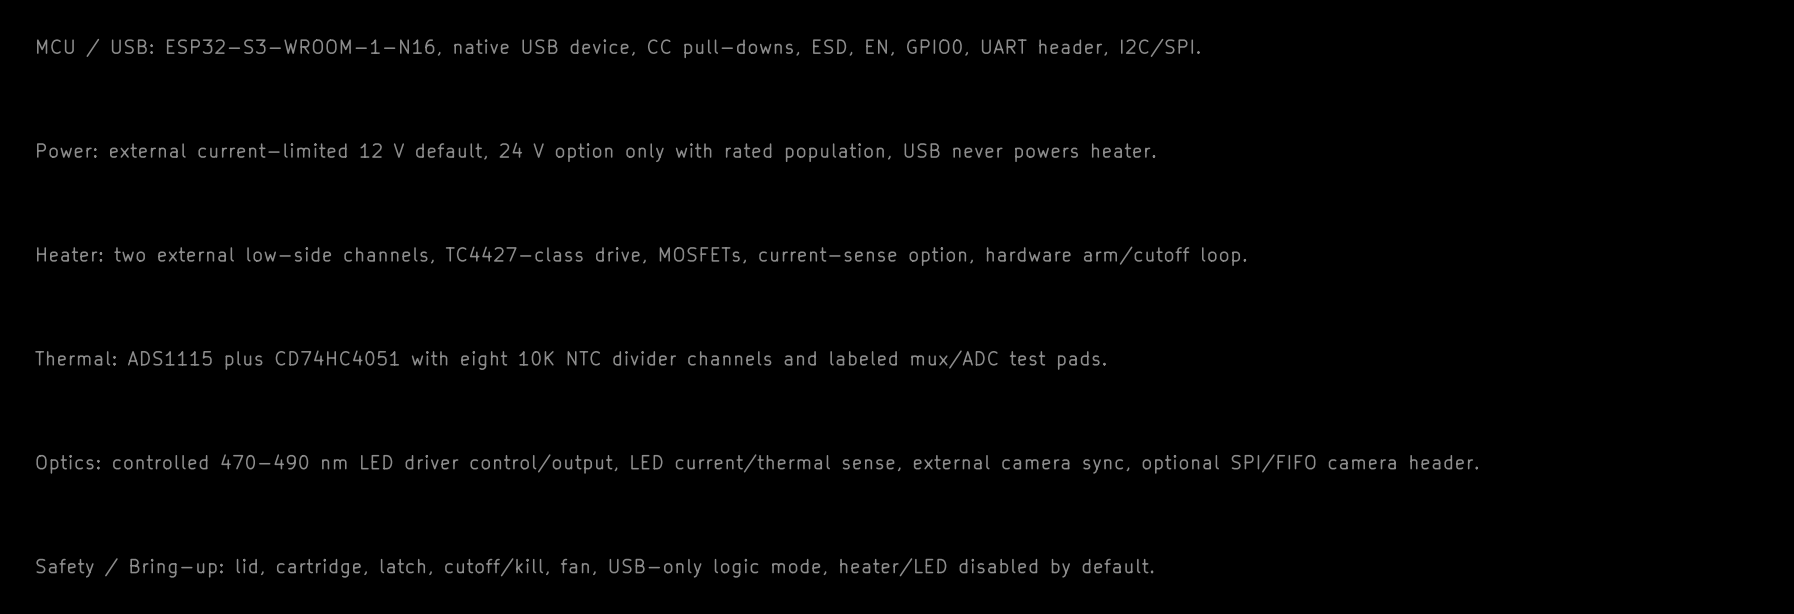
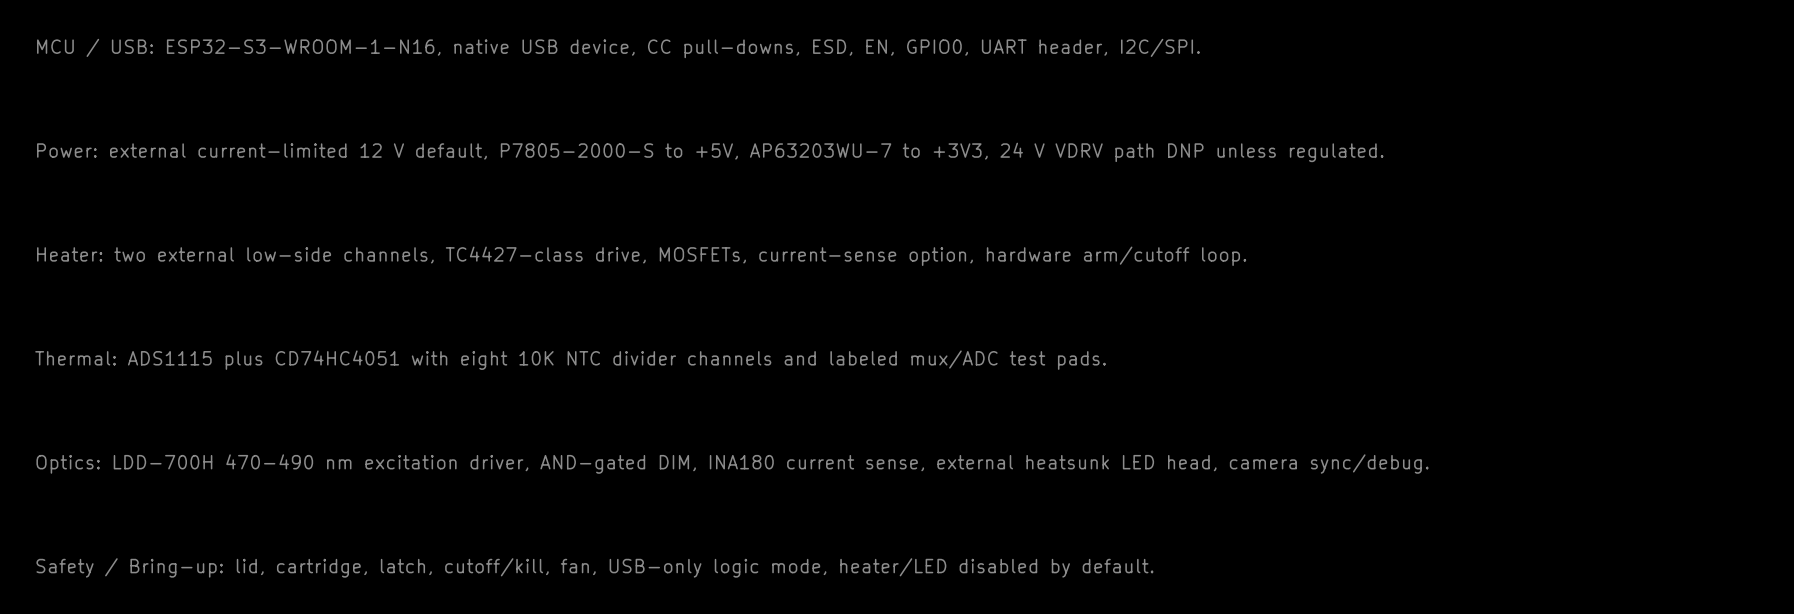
text: Power: external current-limited 12 V default, 24 V option only with rated population, USB never powers heater. (596, 152) -> Power: external current-limited 12 V default, P7805-2000-S to +5V, AP63203WU-7 to +3V3, 24 V VDRV path DNP unless regulated. (710, 152)
text: Optics: controlled 470-490 nm LED driver control/output, LED current/thermal sense, external camera sync, optional SPI/FIFO camera header. (757, 464) -> Optics: LDD-700H 470-490 nm excitation driver, AND-gated DIM, INA180 current sense, external heatsunk LED head, camera sync/debug. (732, 464)

